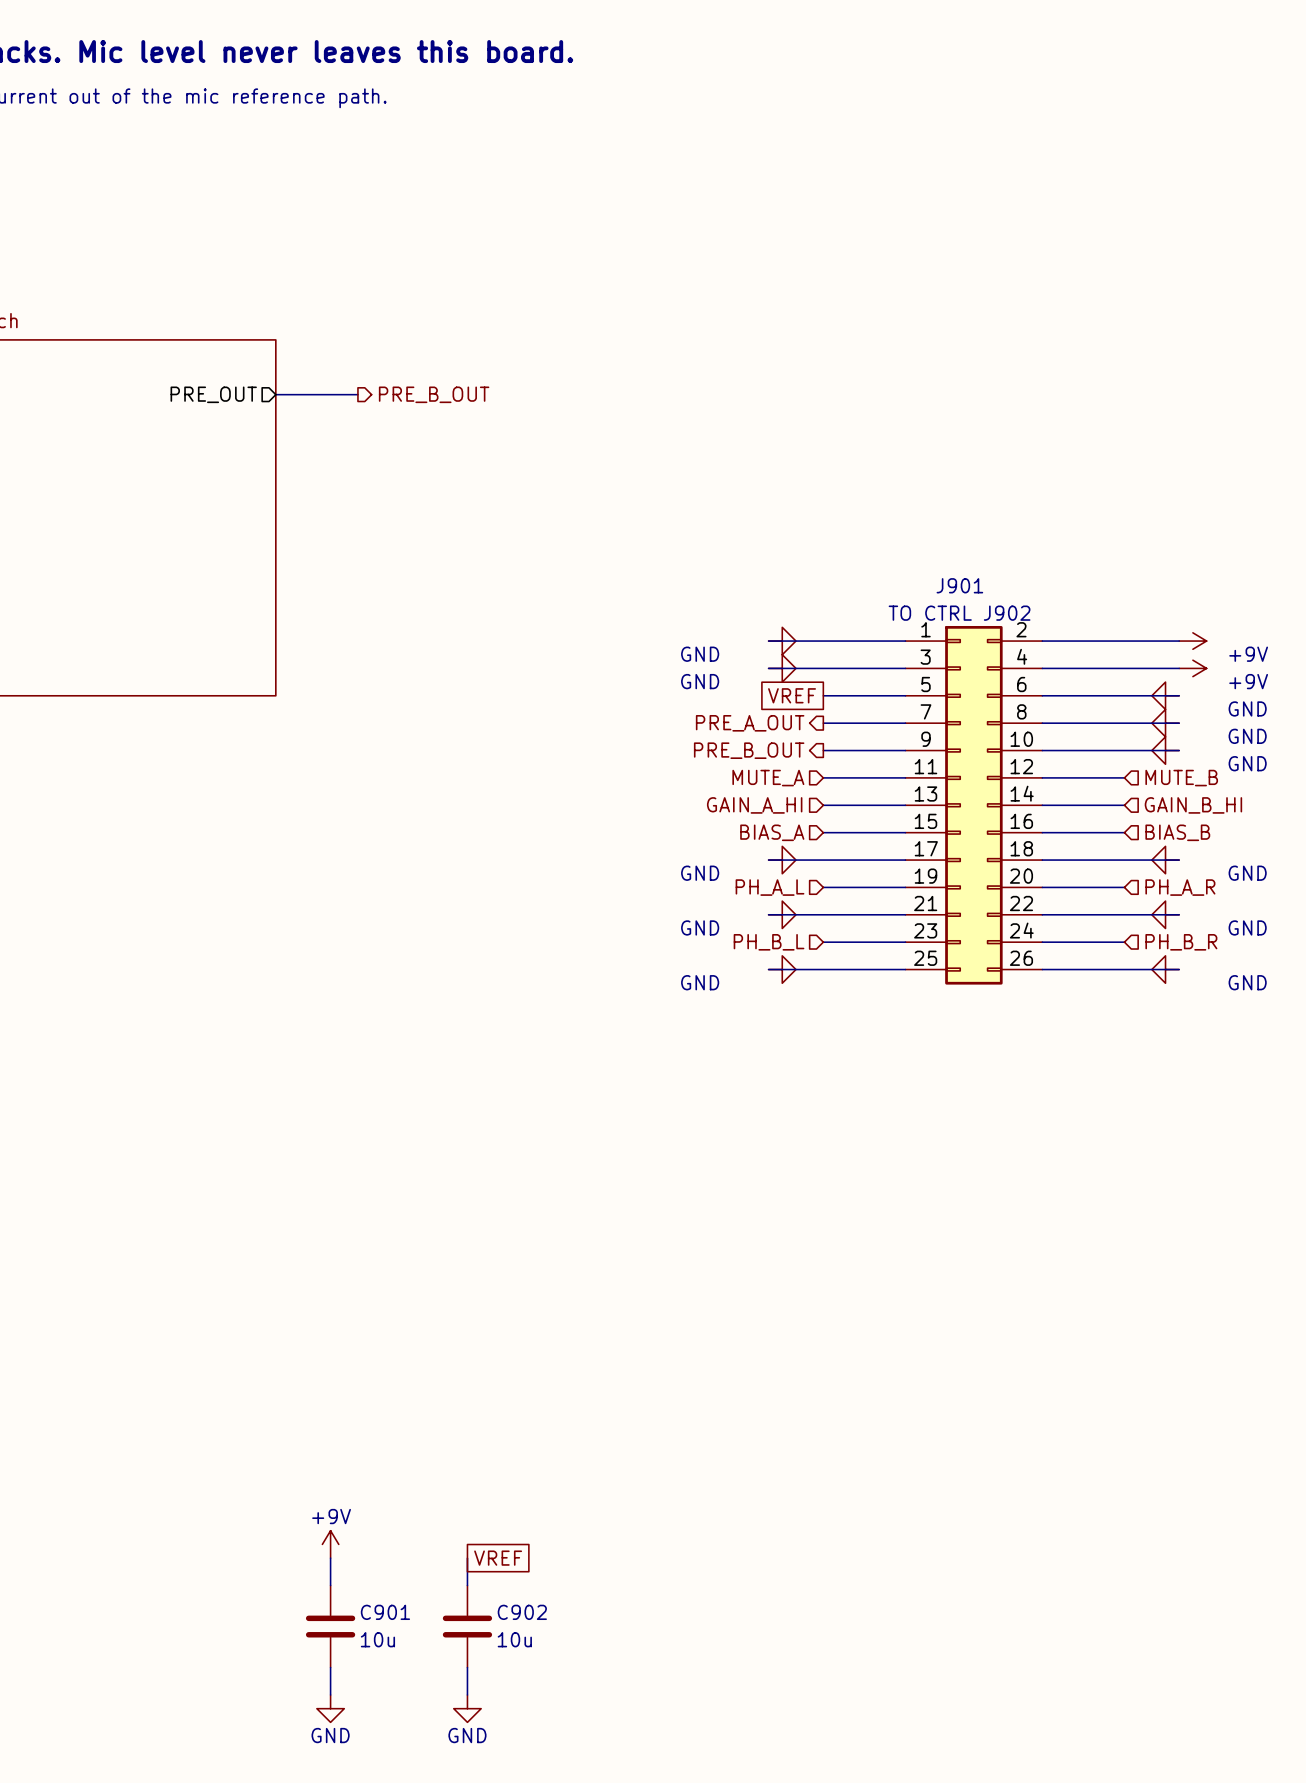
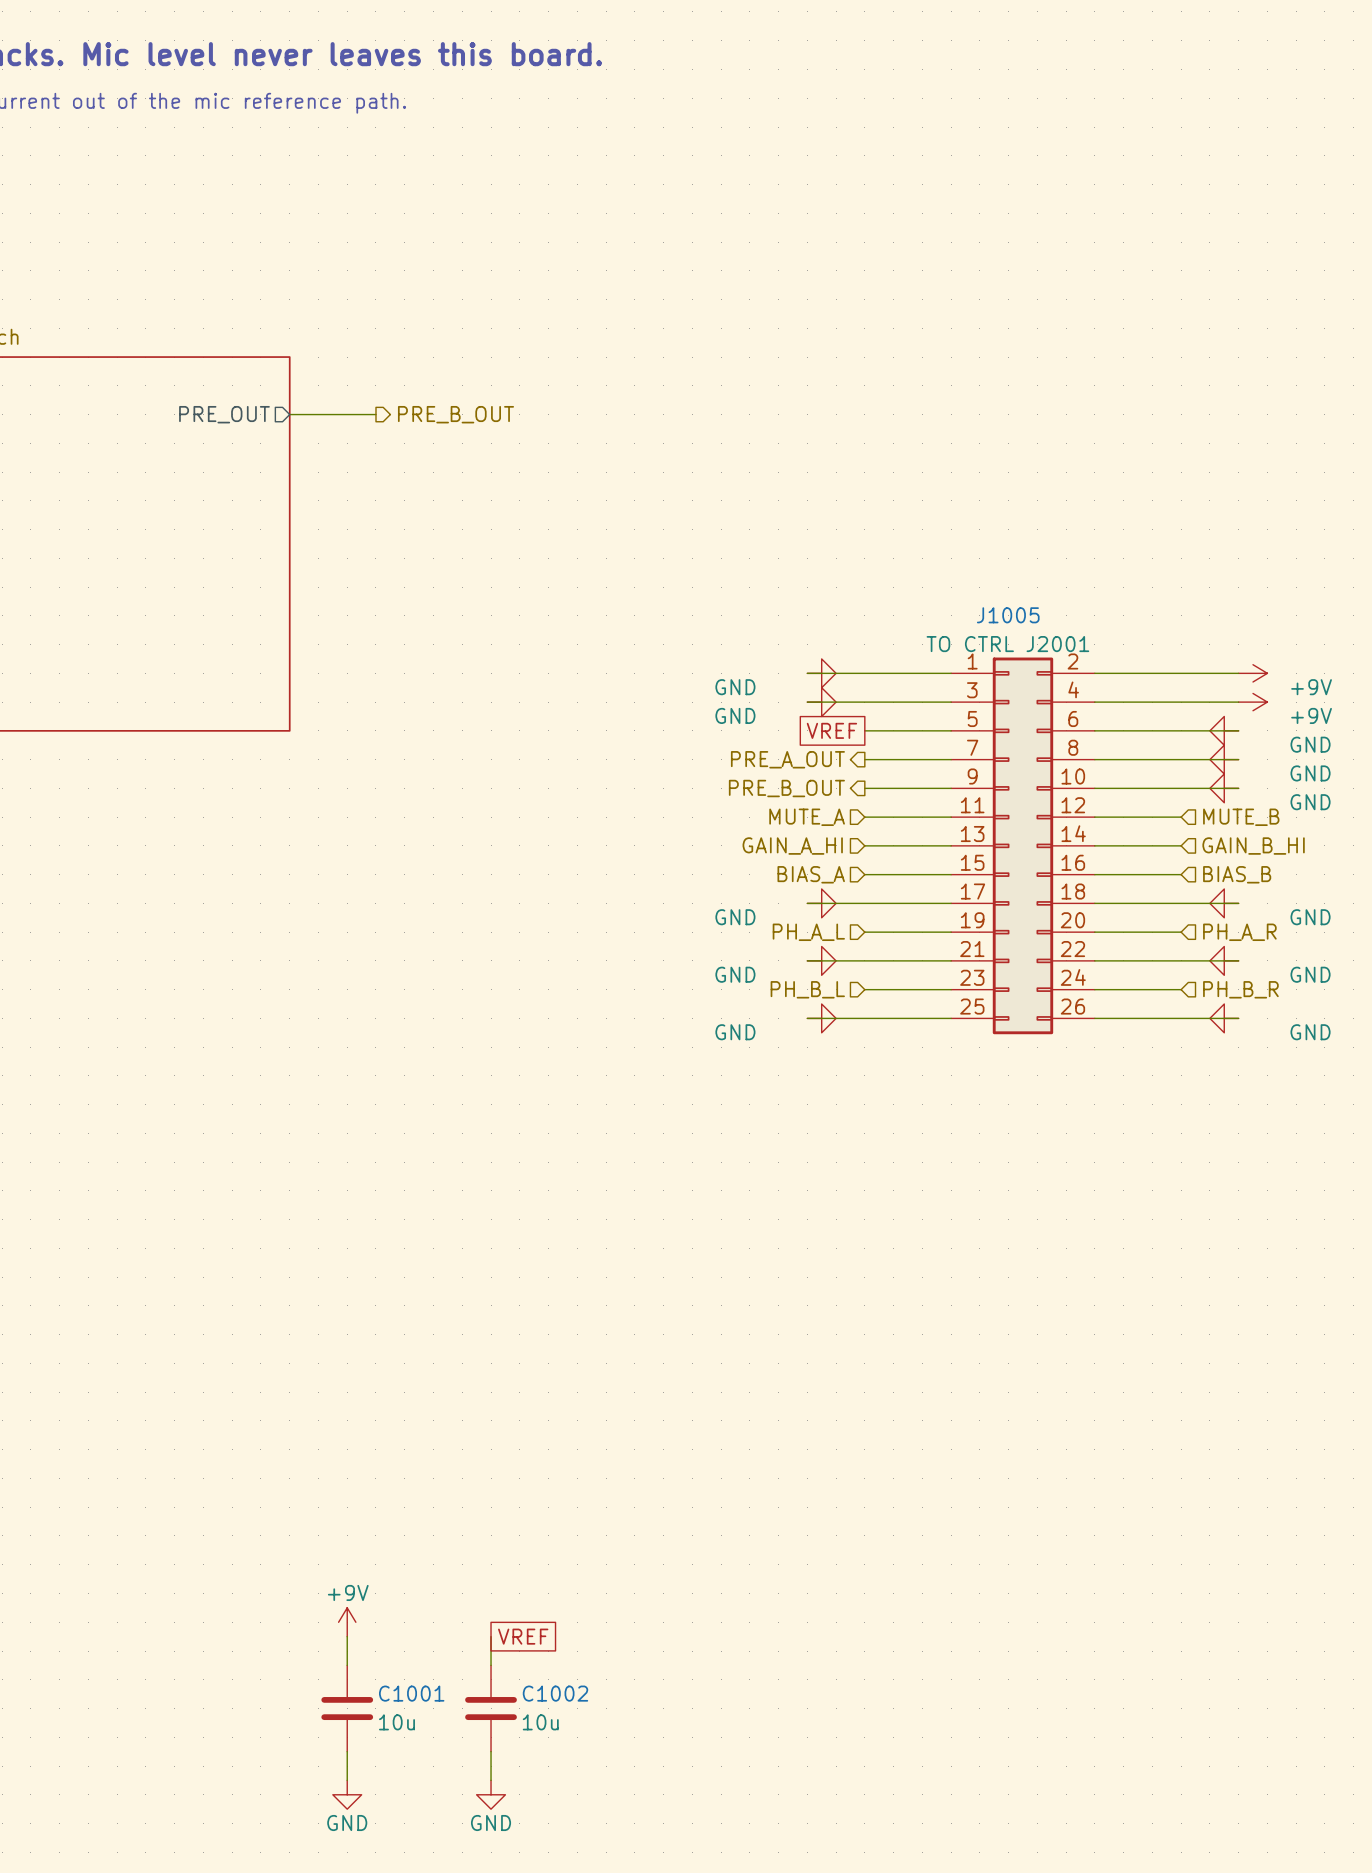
J901 name: J901 (959, 585) -> J1005 (1008, 615)
J901 value: TO CTRL J902 (959, 613) -> TO CTRL J2001 (1007, 644)
C901 name: C901 (385, 1612) -> C1001 (411, 1693)
C902 name: C902 (522, 1612) -> C1002 (555, 1693)

